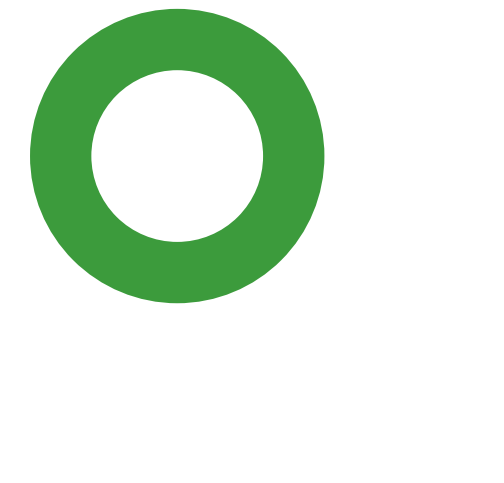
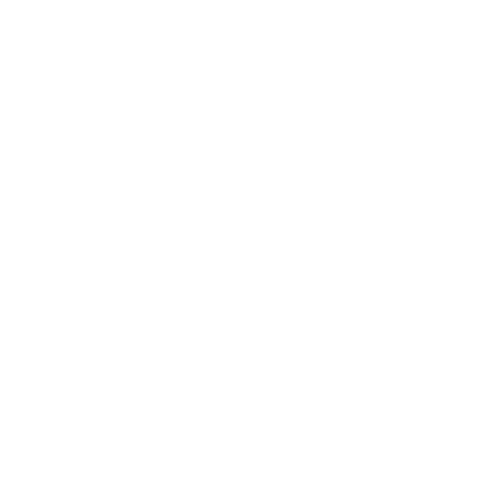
part: (177, 156) -> none

